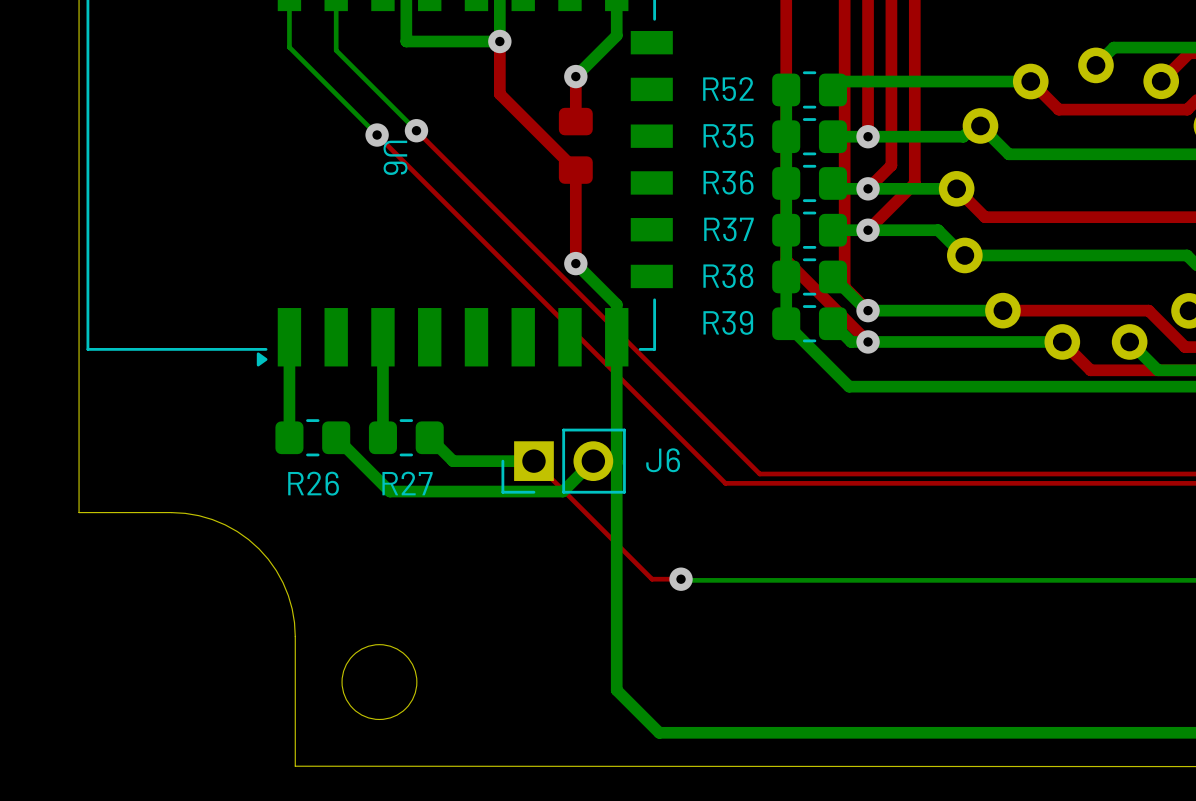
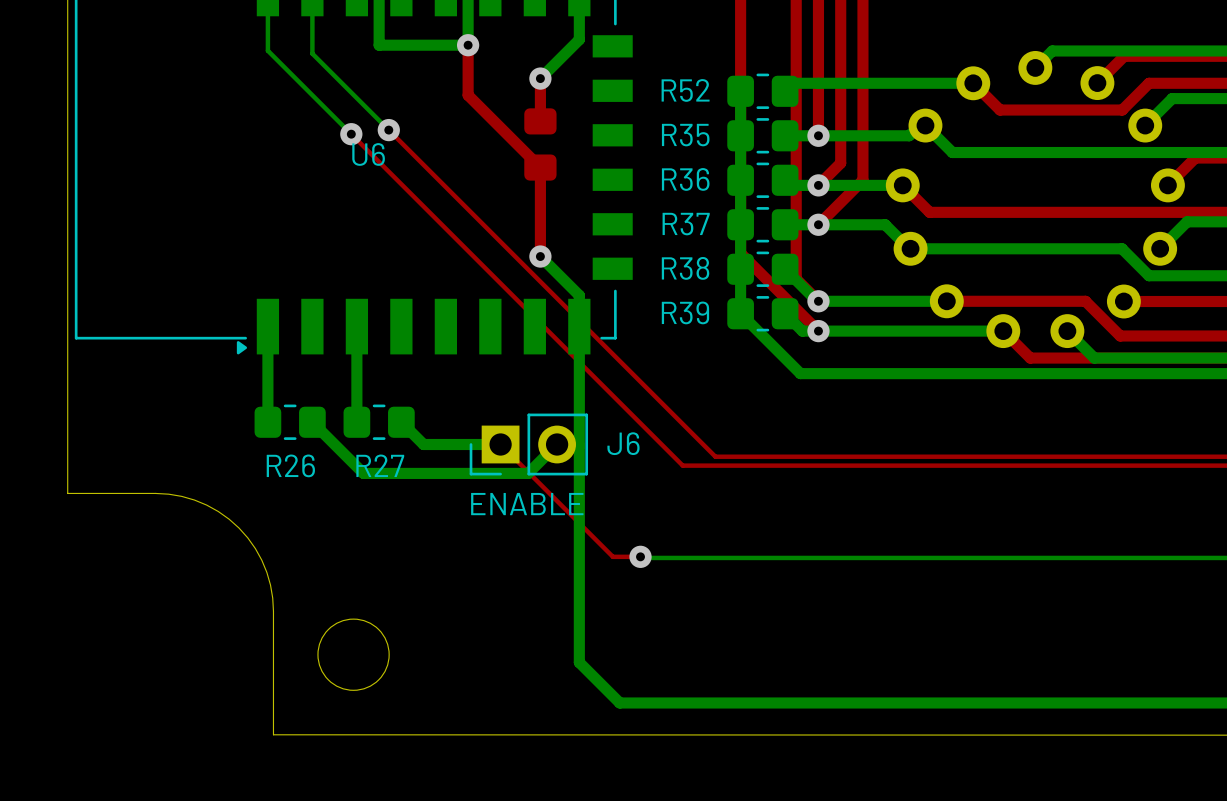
U6 name rotation: 0° (395, 157) -> 90° counterclockwise (368, 154)
text: none -> ENABLE (527, 504)

